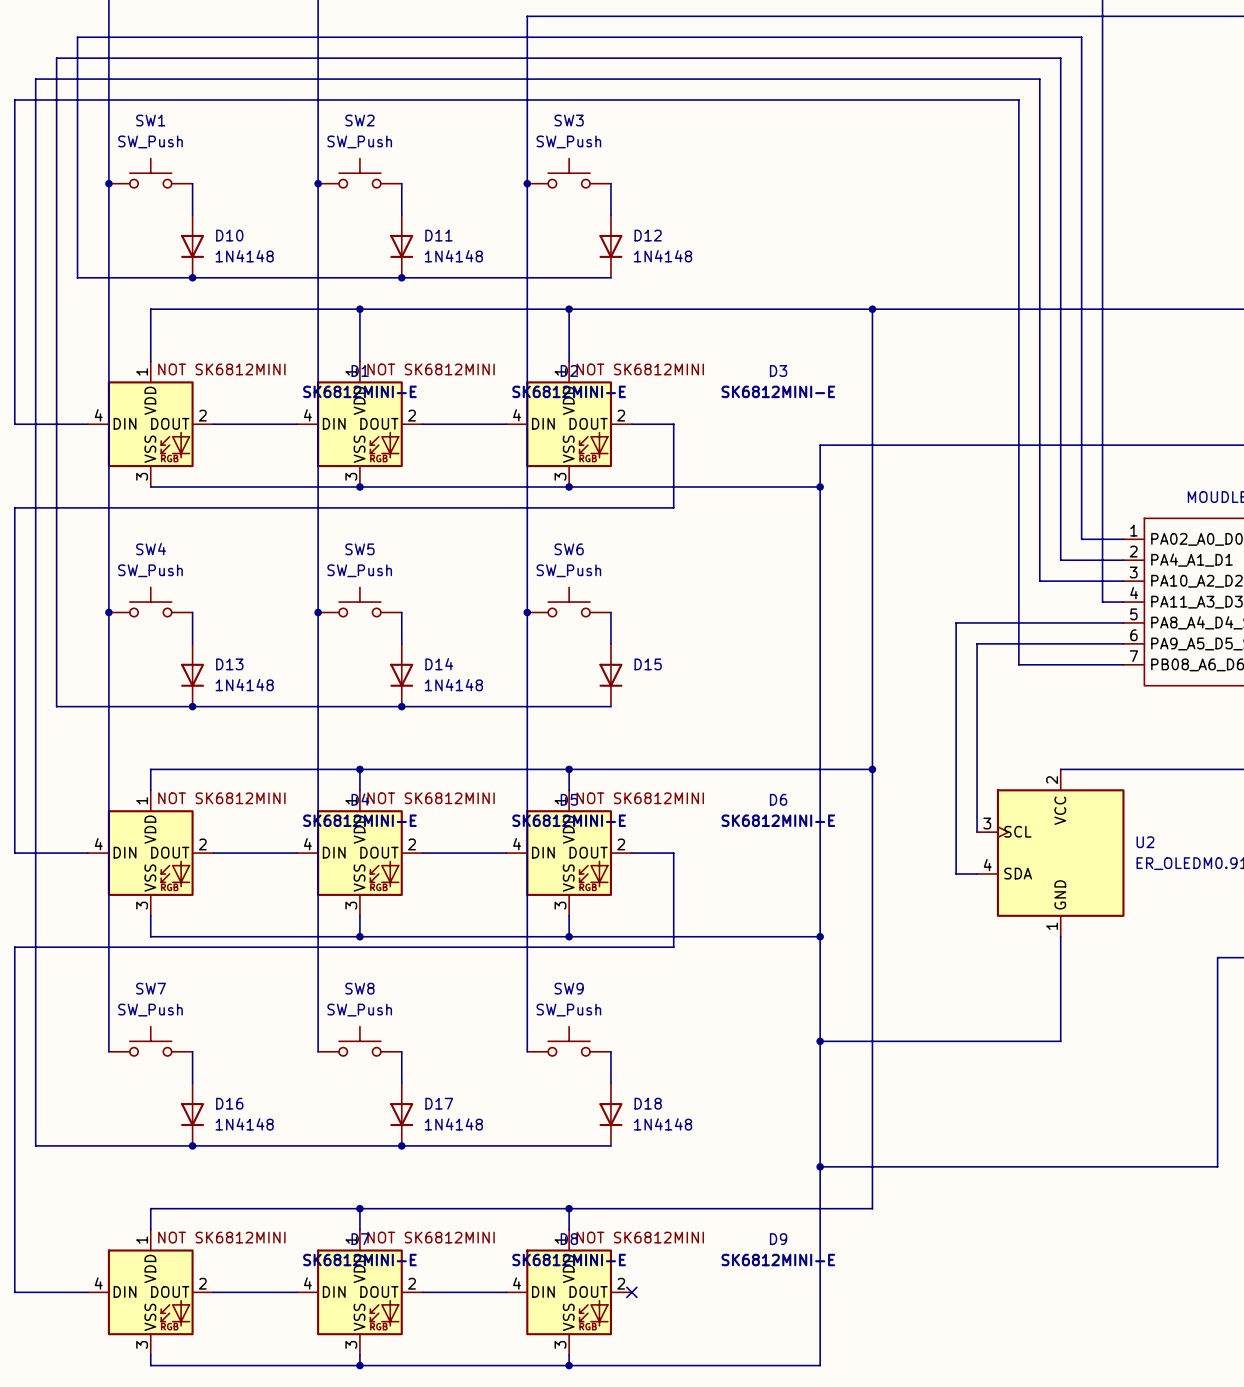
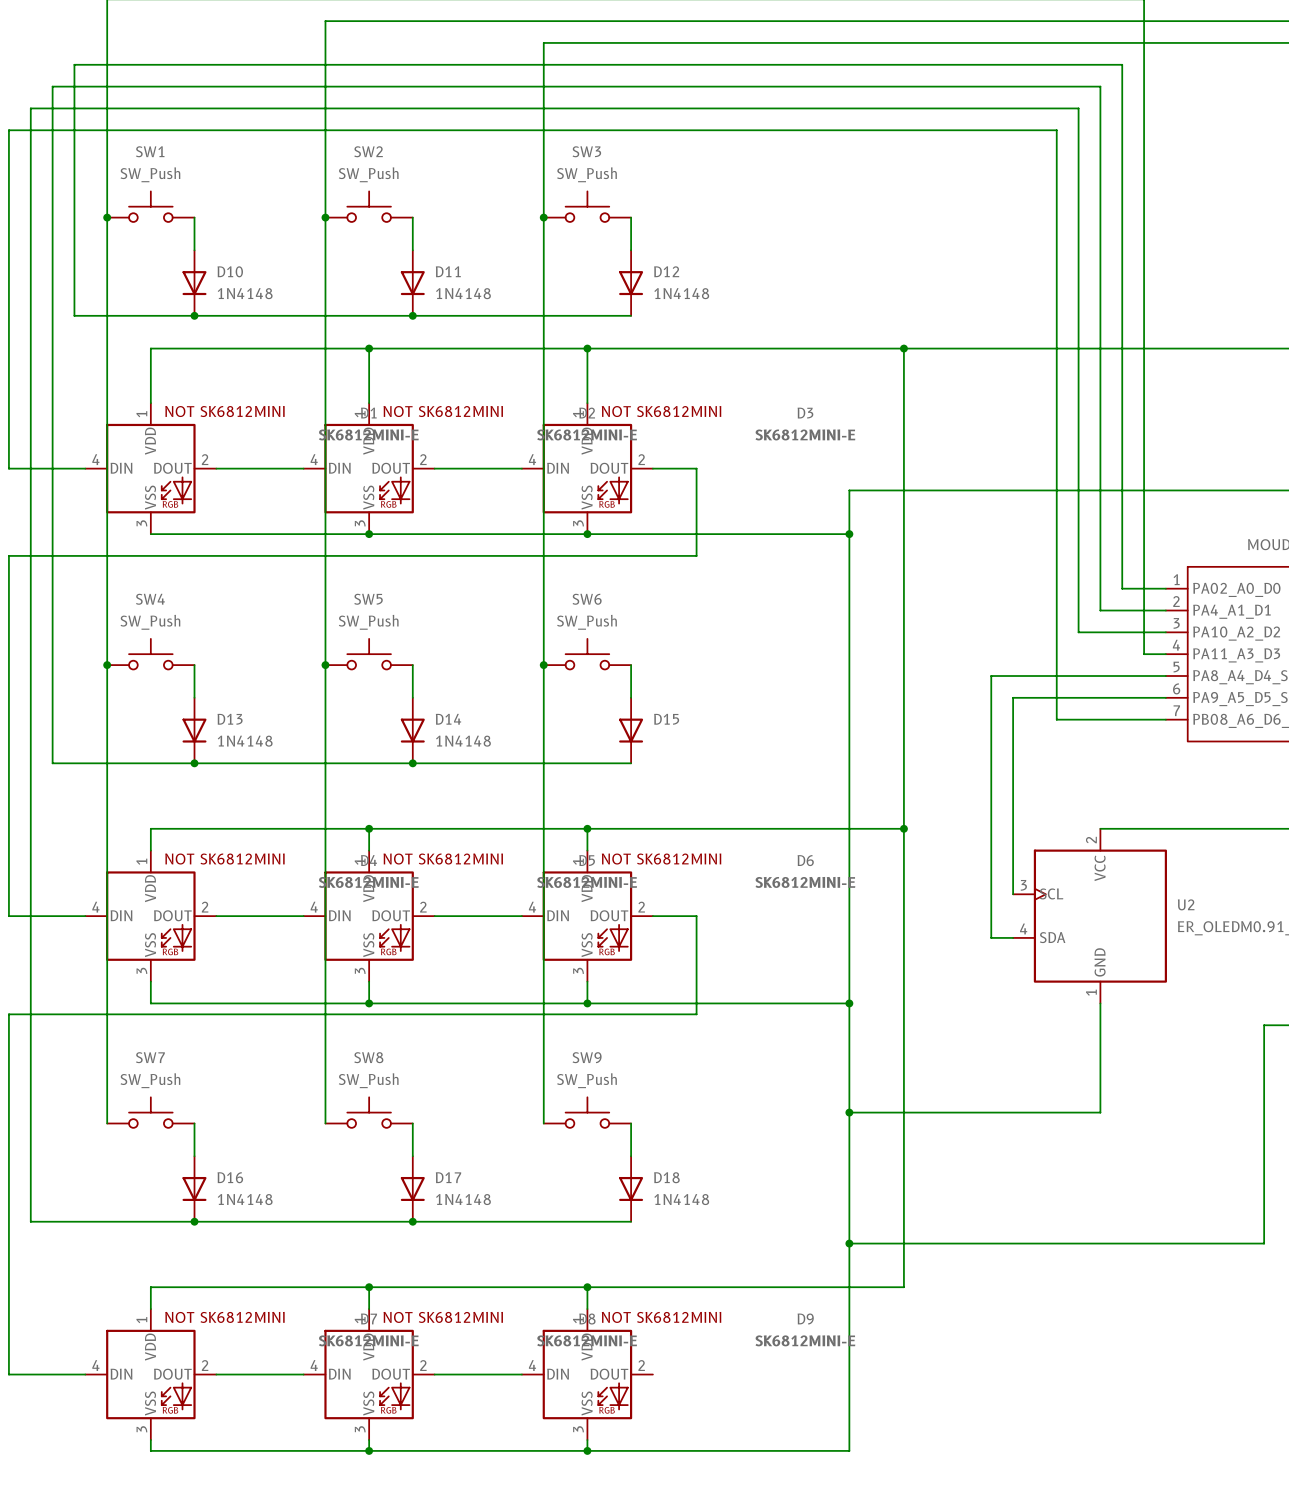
no-connect mark: (631, 1292) -> none

